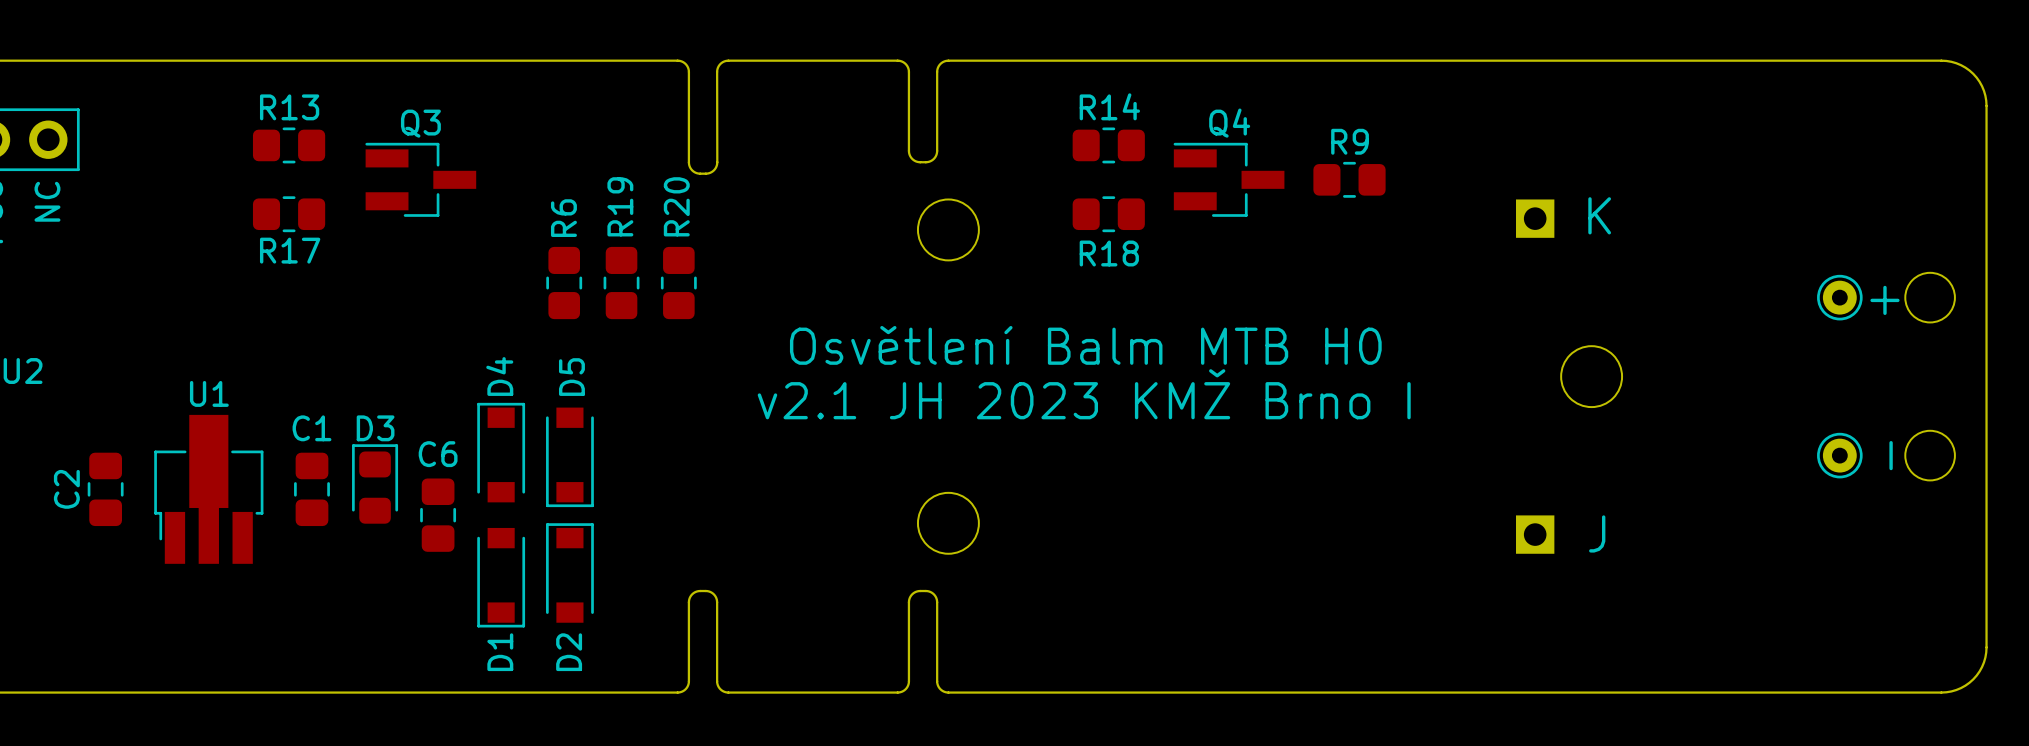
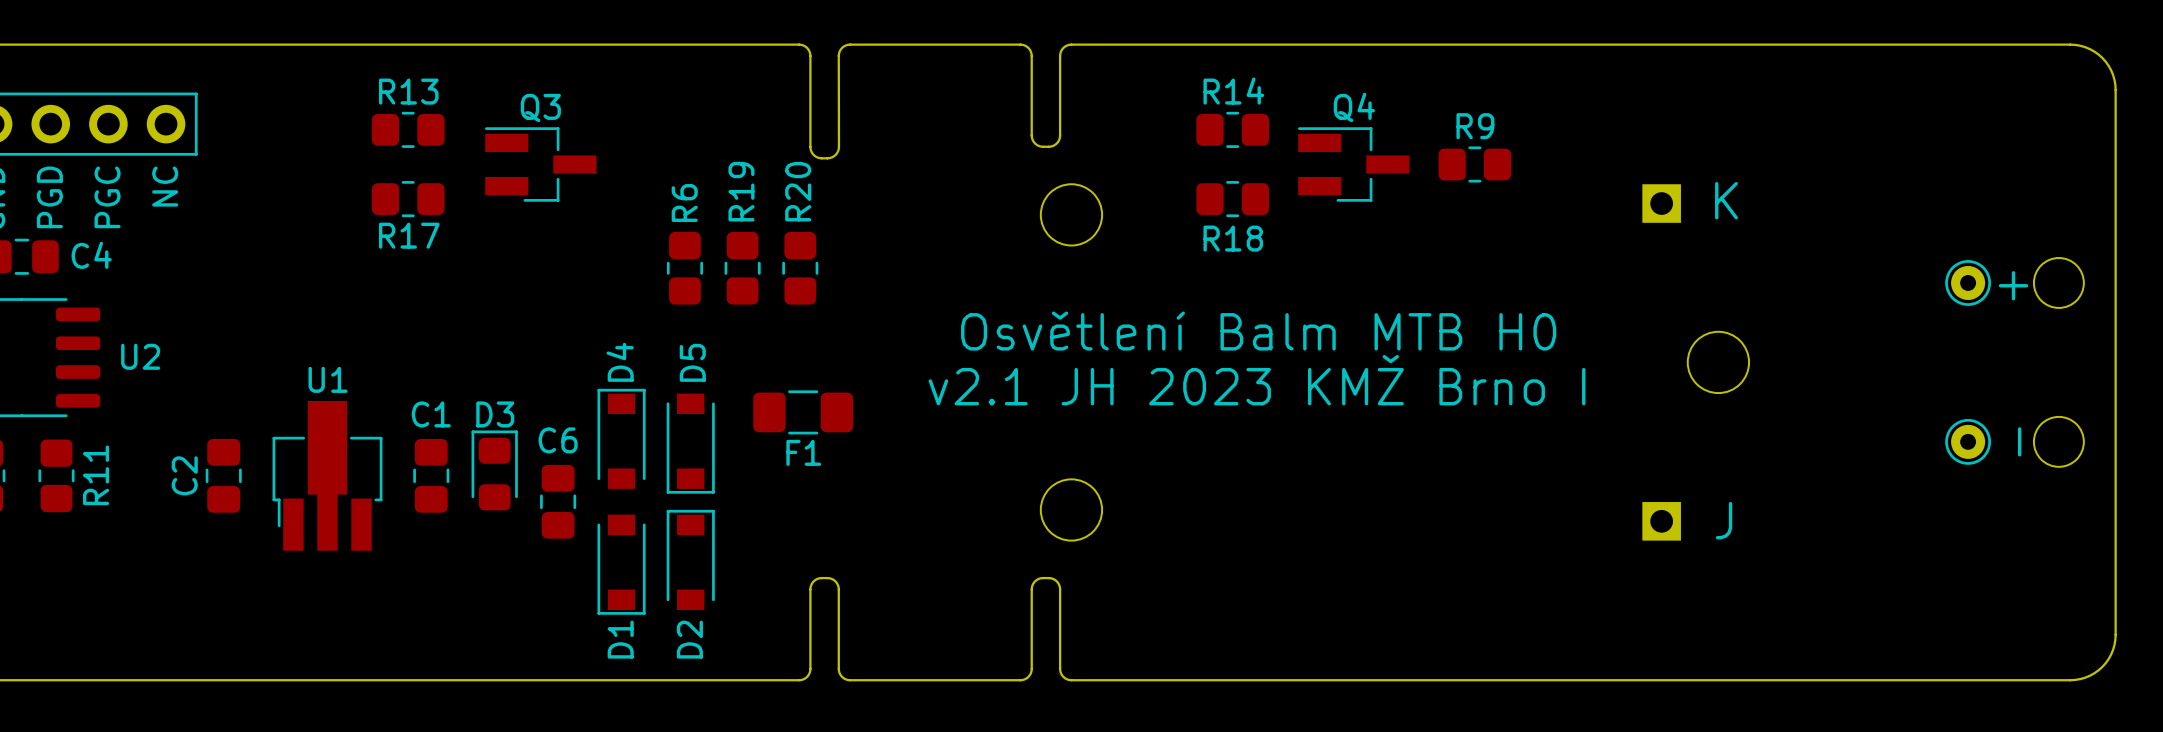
text position: Osvětlení Balm MTB H0 (1085, 345) -> Osvětlení Balm MTB H0 (1258, 331)
text position: v2.1 JH 2023 KMŽ Brno I (1084, 394) -> v2.1 JH 2023 KMŽ Brno I (1257, 380)
F1: none -> (803, 412)

